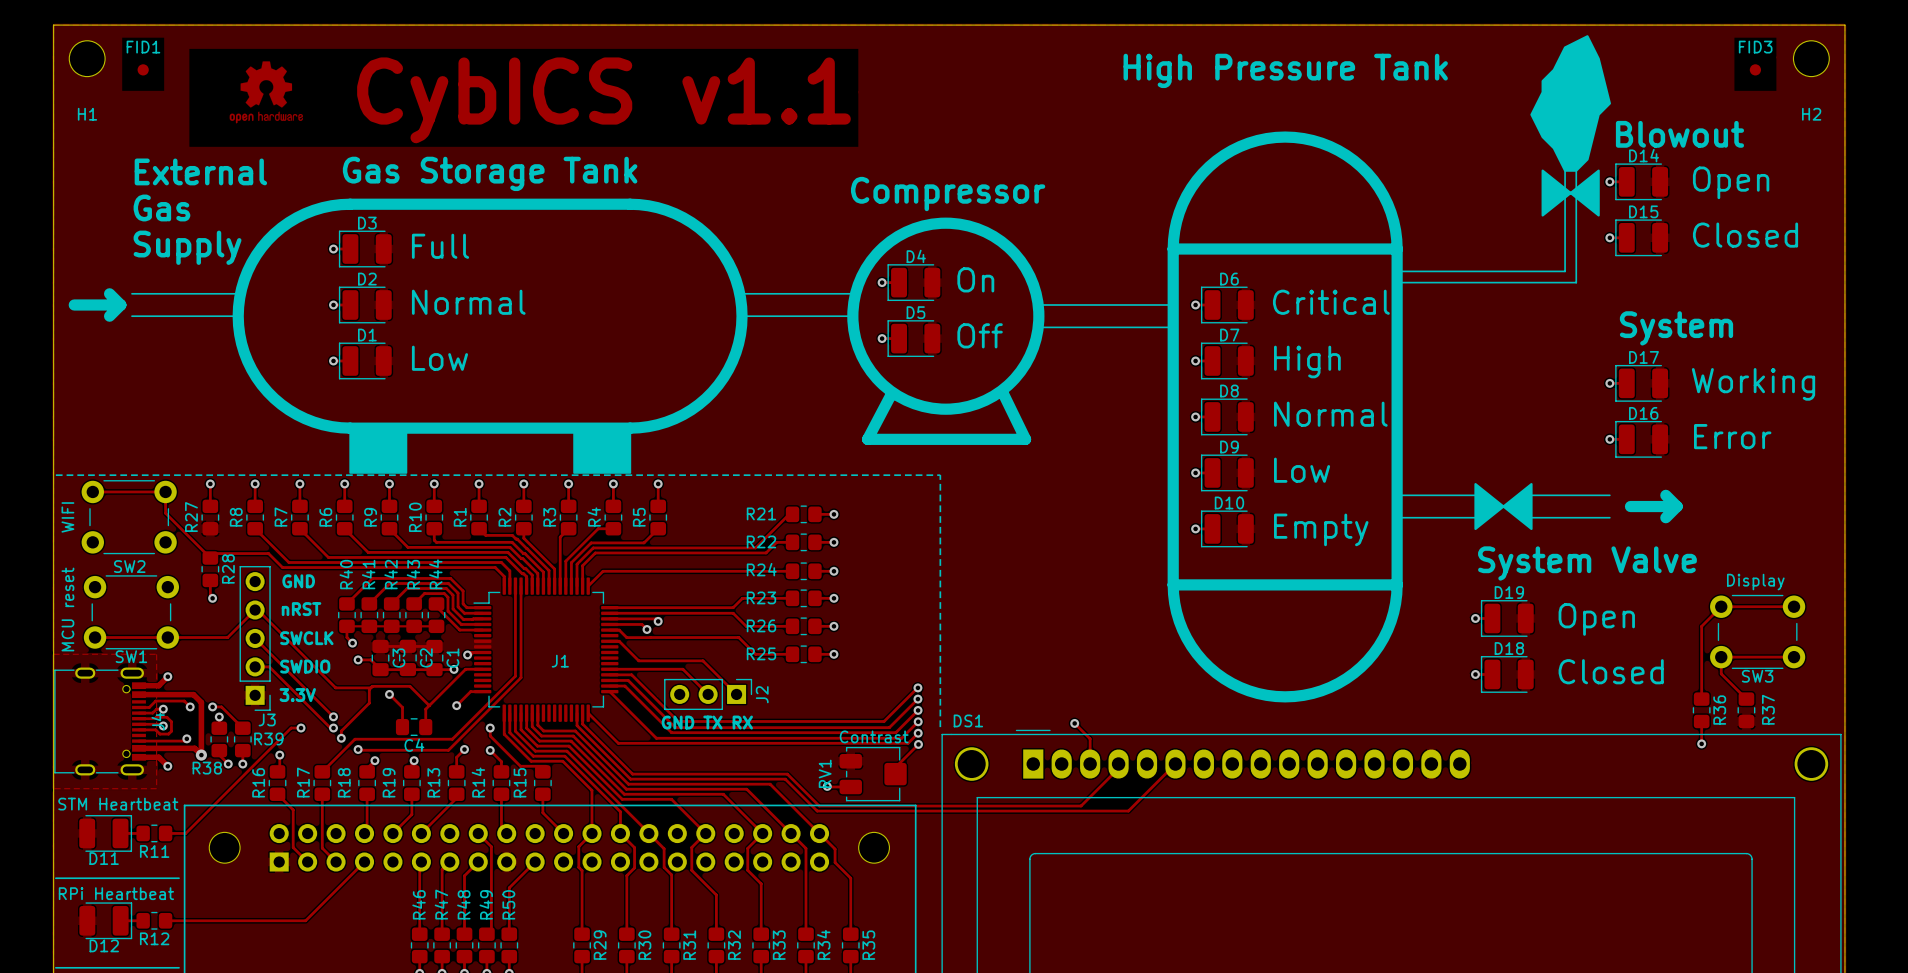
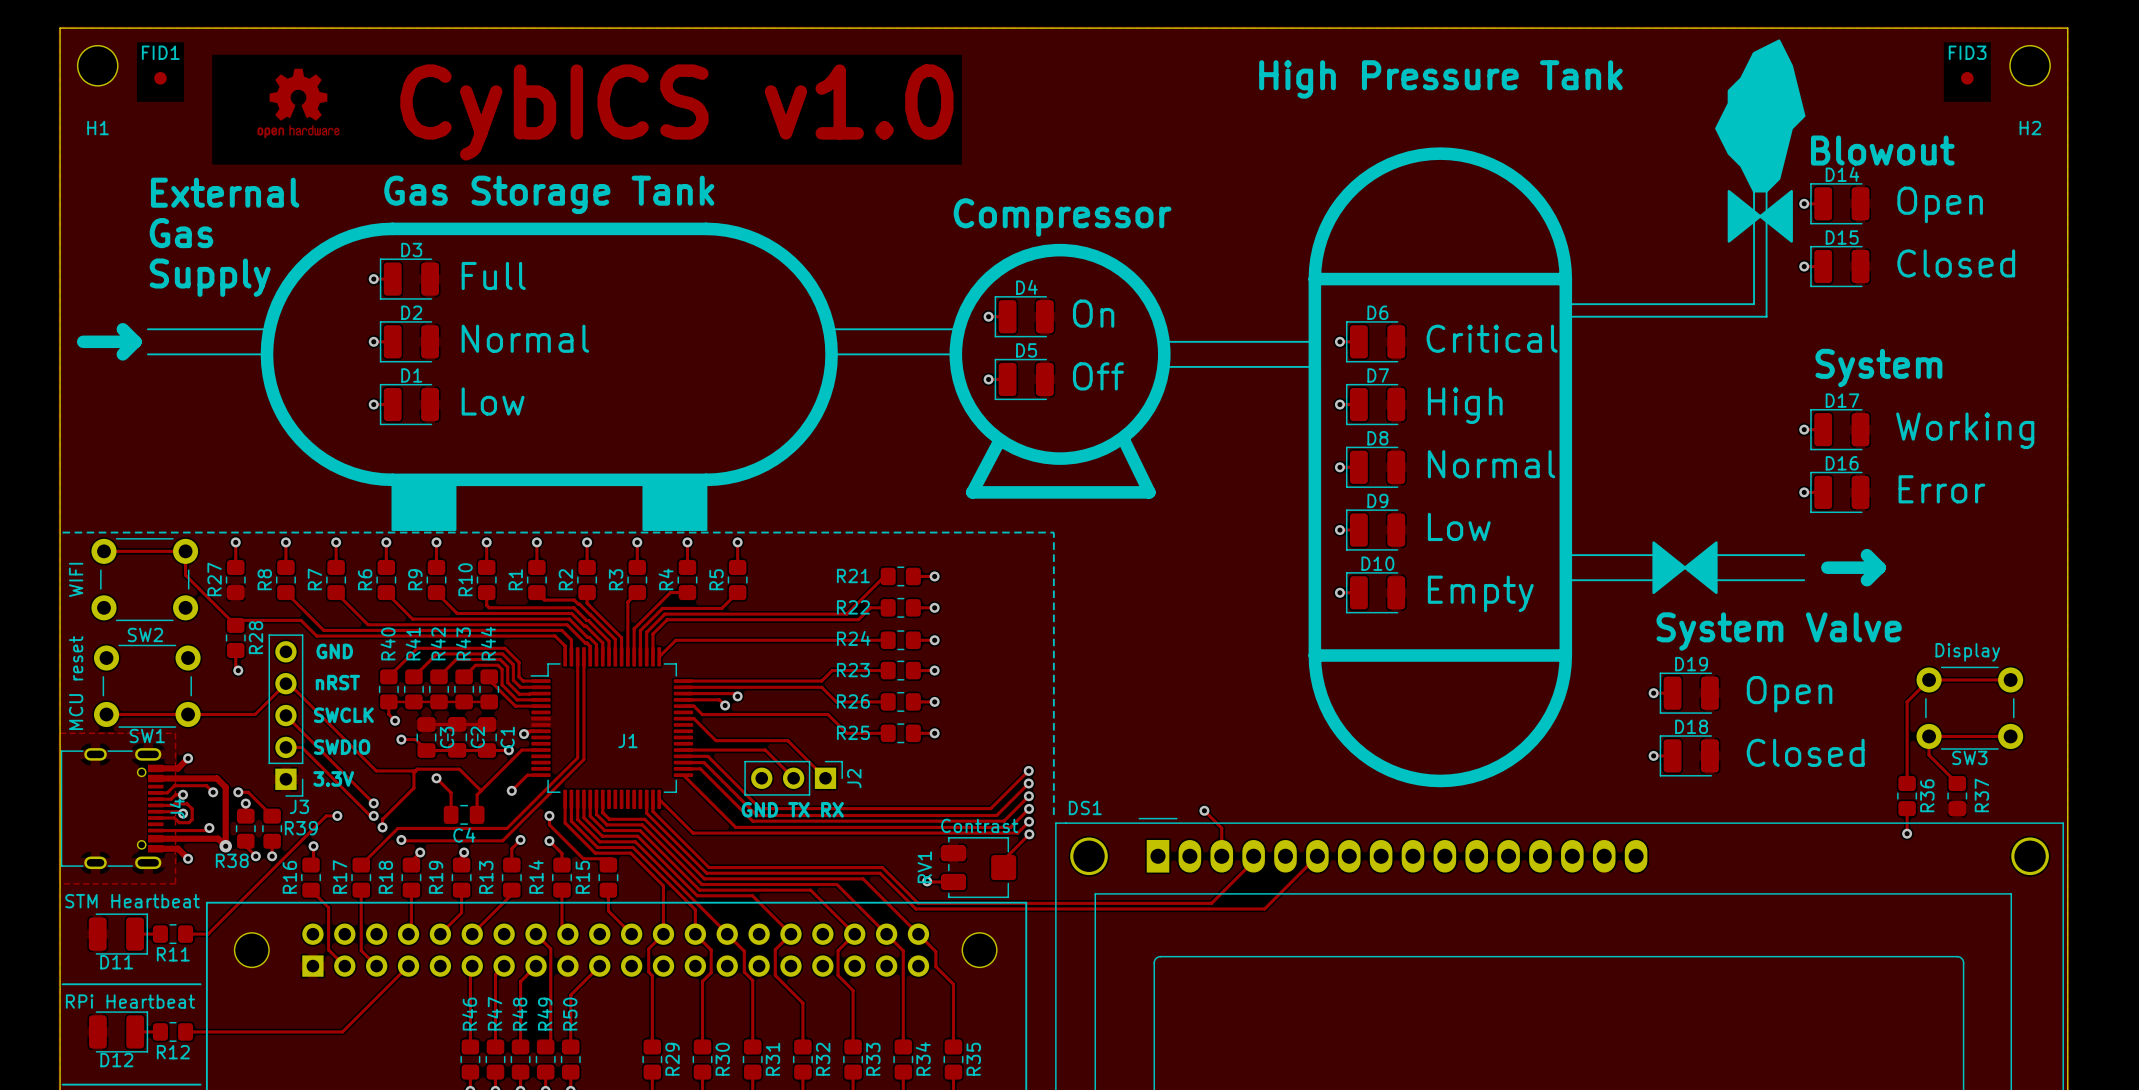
text: CybICS v1.1 (603, 100) -> CybICS v1.0 (676, 112)

